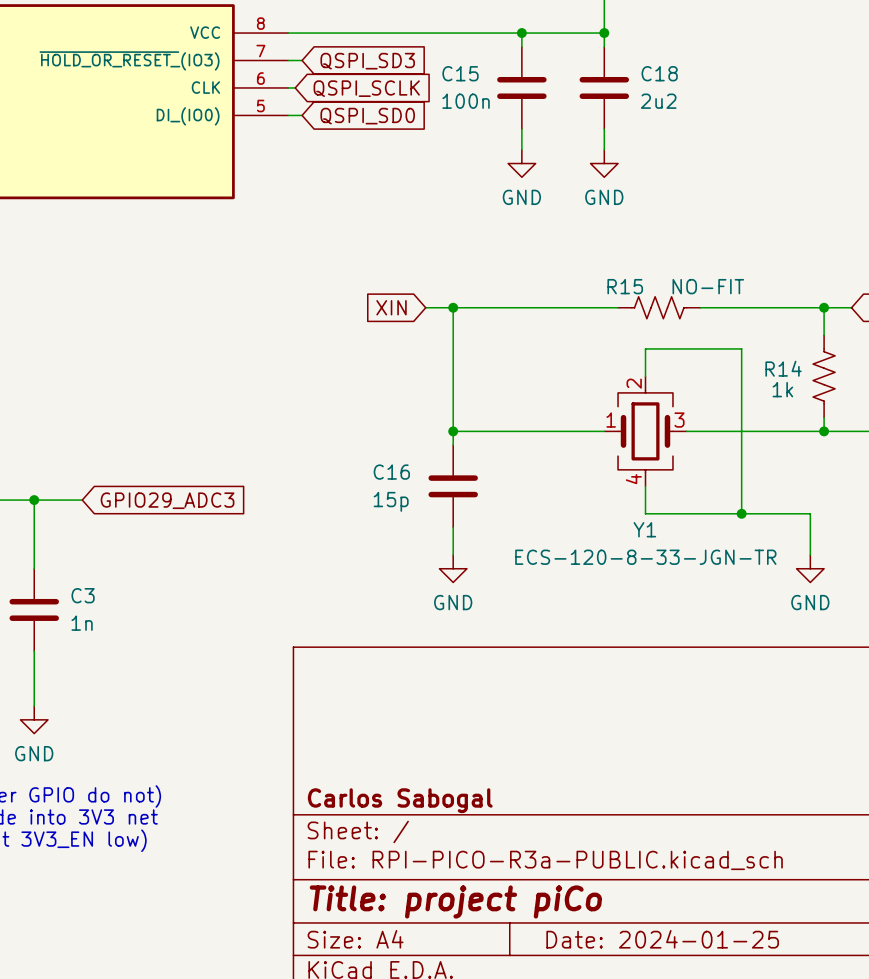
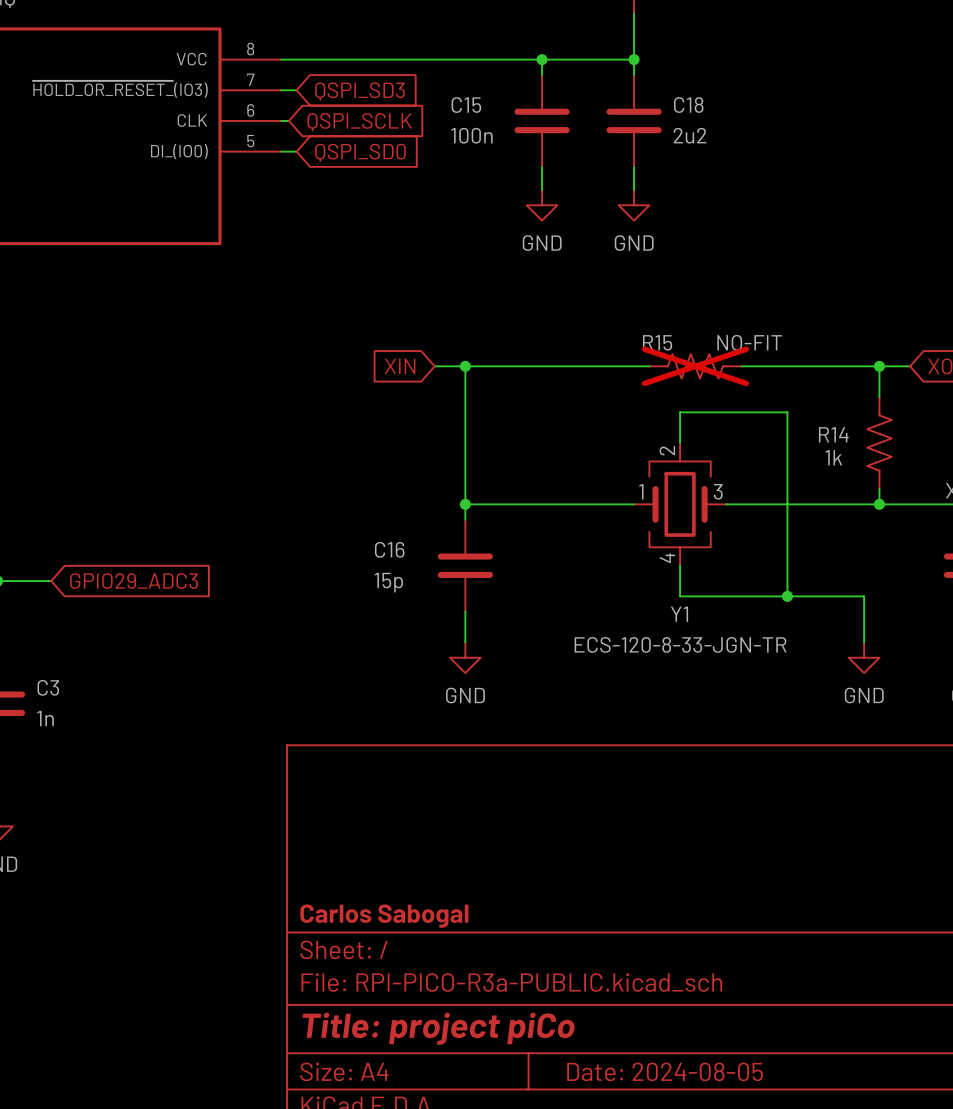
R15 do-not-place cross: none -> (695, 366)
title block: Date: 2024-01-25 (662, 939) -> Date: 2024-08-05 (665, 1071)

